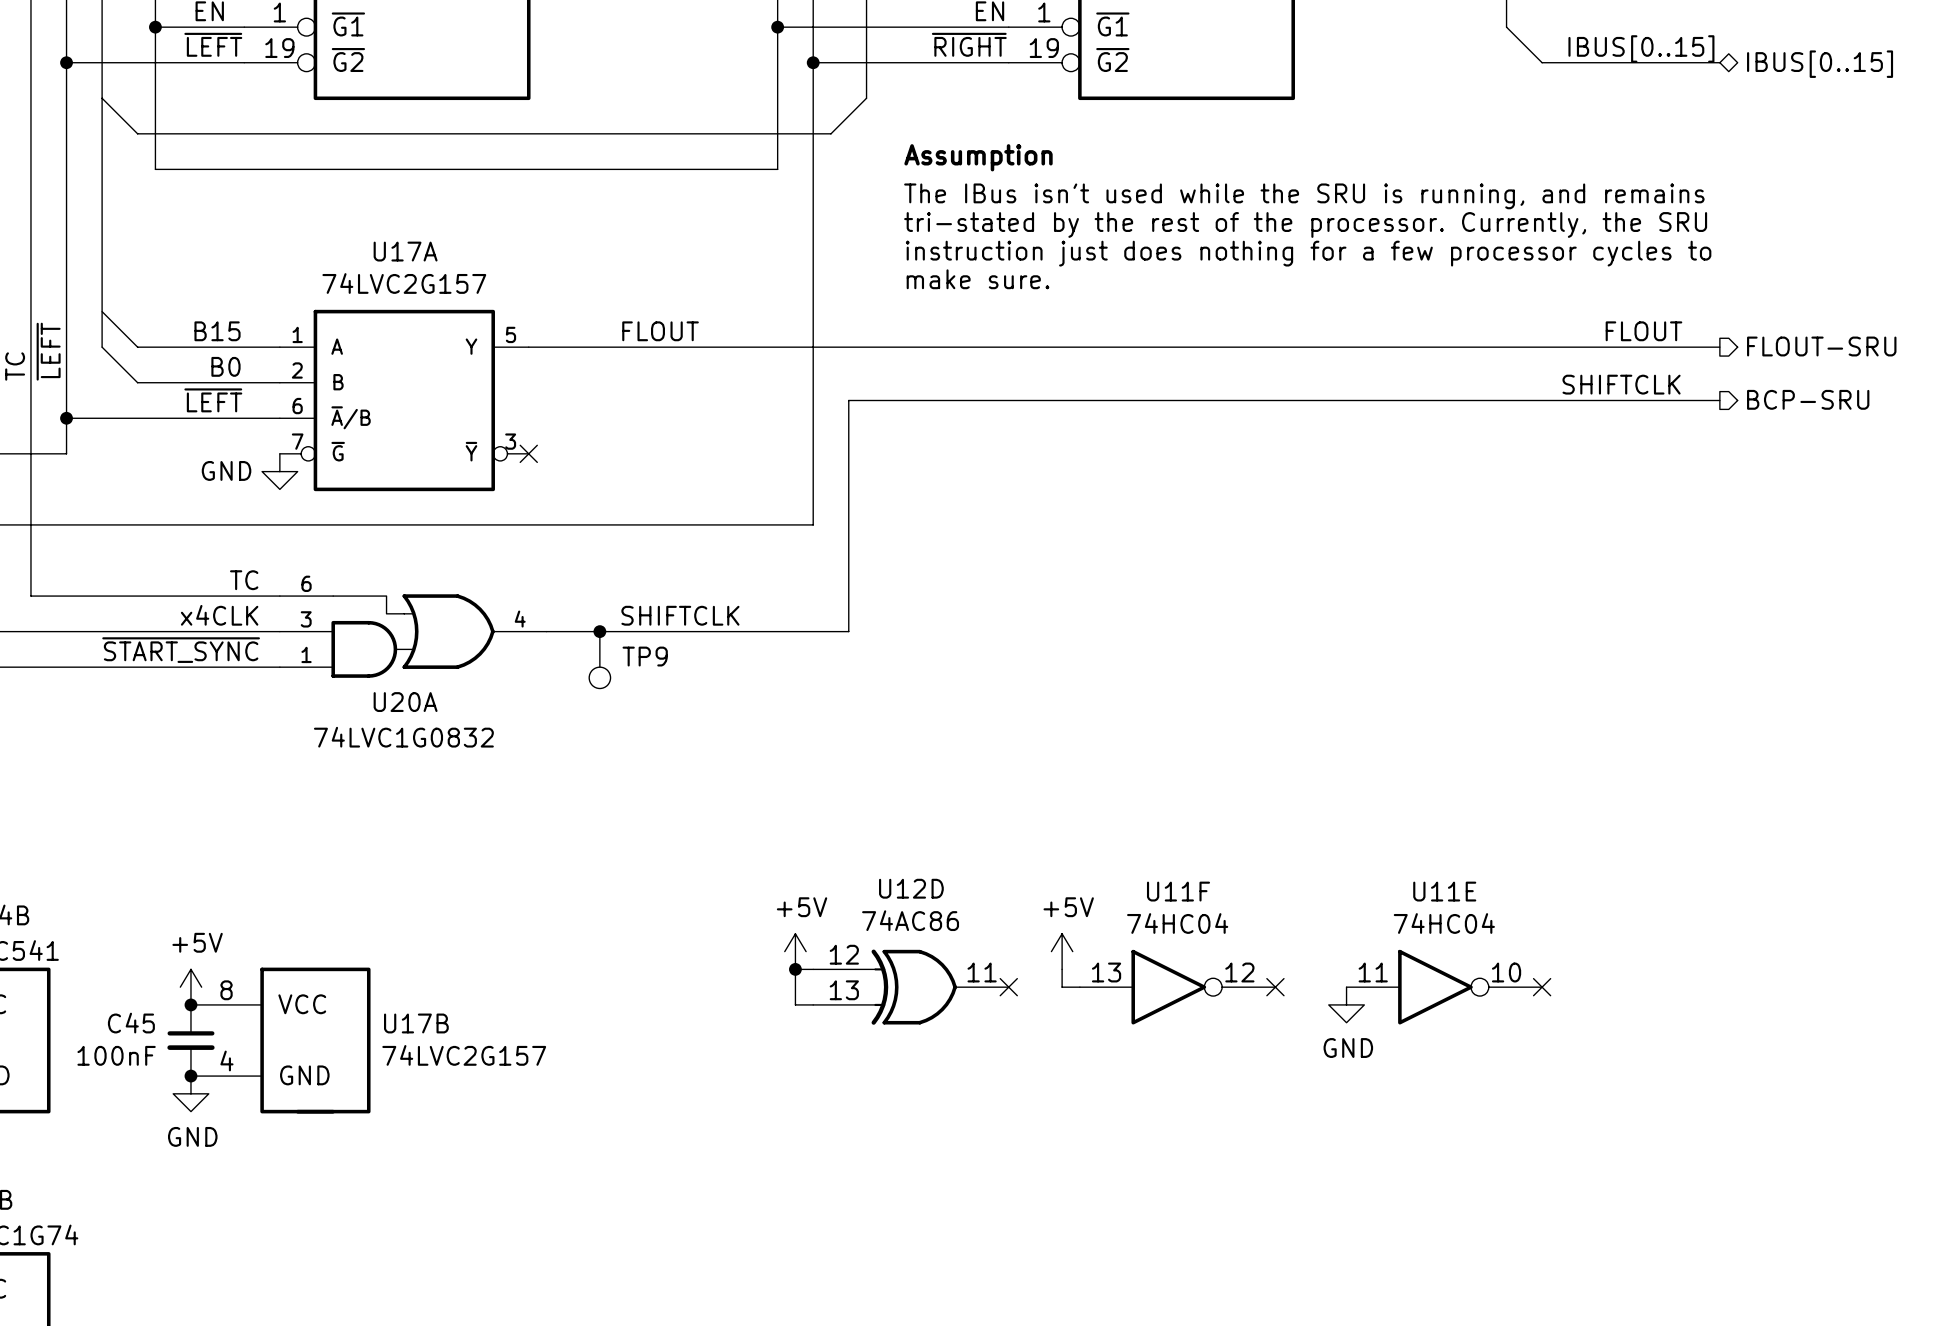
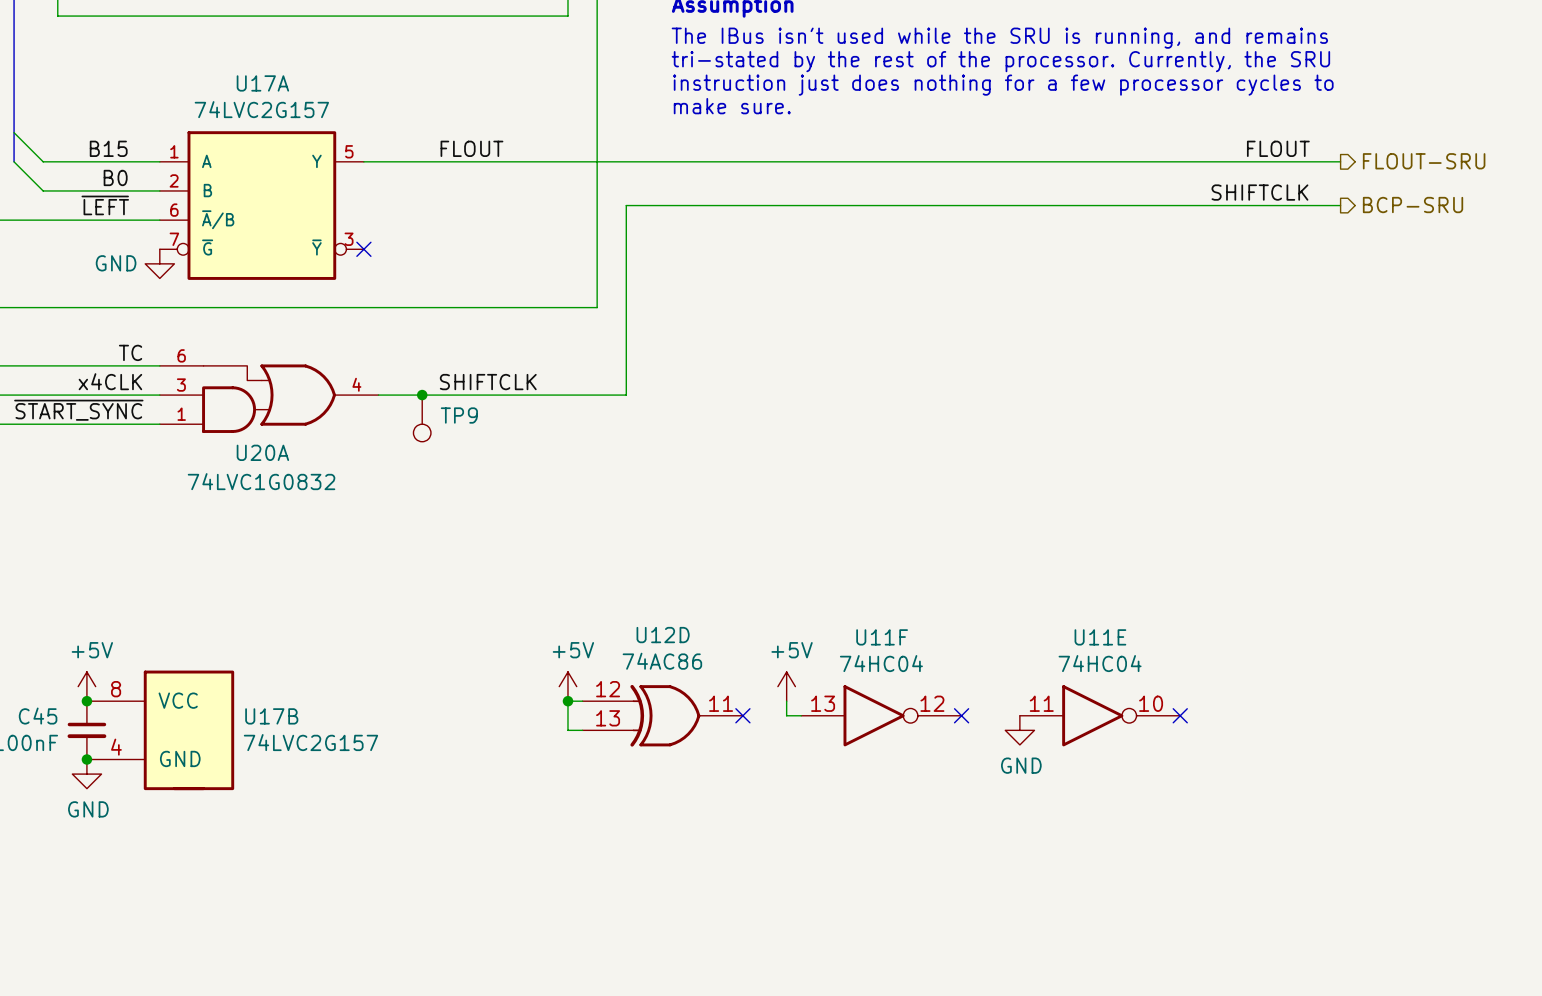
power symbol position: +5V (795, 951) -> +5V (567, 686)
power symbol position: +5V (1062, 951) -> +5V (786, 686)
junction position: (795, 969) -> (567, 701)
wire: (813, 969) (795, 969) (795, 1004) (813, 1004) -> (582, 701) (567, 701) (567, 730) (582, 730)
wire: (1062, 969) (1062, 987) (1079, 987) -> (786, 701) (786, 715) (801, 715)
U12D position: (910, 987) -> (662, 715)
no-connect mark position: (1008, 987) -> (742, 715)
U11F position: (1177, 987) -> (881, 715)
no-connect mark position: (1275, 987) -> (961, 715)
U11E position: (1444, 987) -> (1100, 715)
no-connect mark position: (1542, 987) -> (1180, 715)
power symbol position: GND (1346, 1004) -> GND (1019, 730)

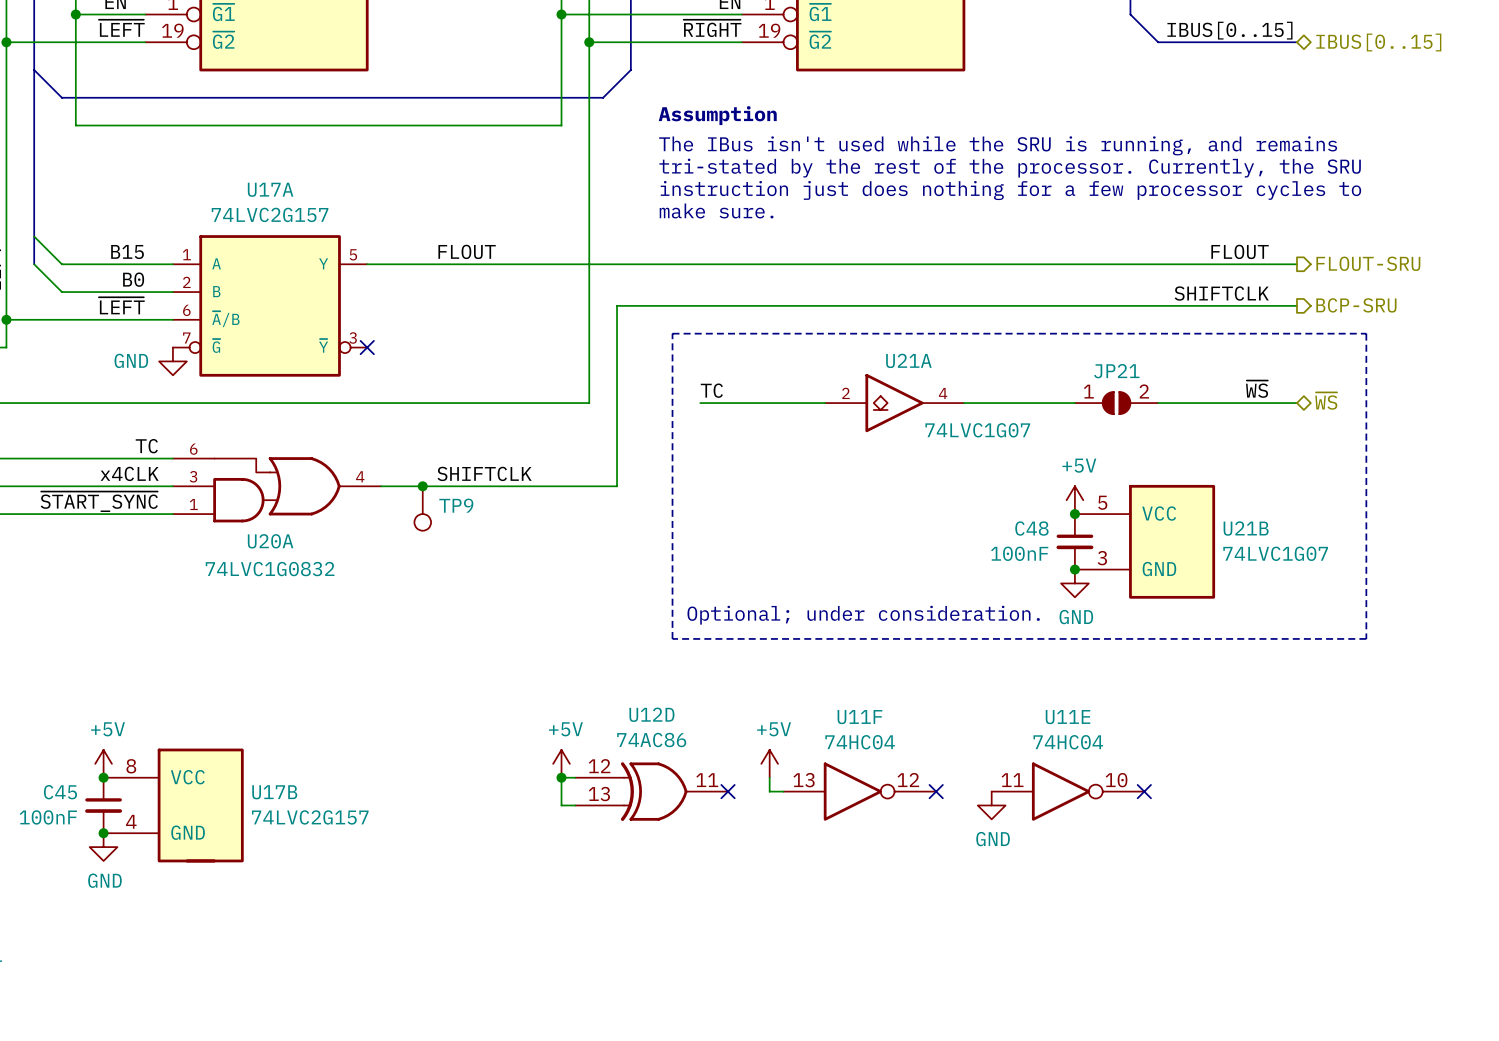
line: none -> (672, 333) (1366, 333) (1366, 638) (672, 638) (672, 333)
label: none -> ~{WS} (1257, 389)
label: none -> TC (711, 390)
hierarchical label: none -> ~{WS} (1326, 401)
wire: none -> (700, 403) (825, 403)
U21A: none -> 74LVC1G07 (894, 403)
wire: none -> (963, 403) (1074, 403)
JP21: none -> (1116, 403)
wire: none -> (1158, 403) (1296, 403)
power symbol: none -> +5V (1074, 500)
junction: none -> (1074, 514)
C48: none -> 100nF (1074, 541)
U21B: none -> 74LVC1G07 (1145, 541)
junction: none -> (1074, 569)
power symbol: none -> GND (1074, 583)
text: none -> Optional; under consideration. (863, 615)

